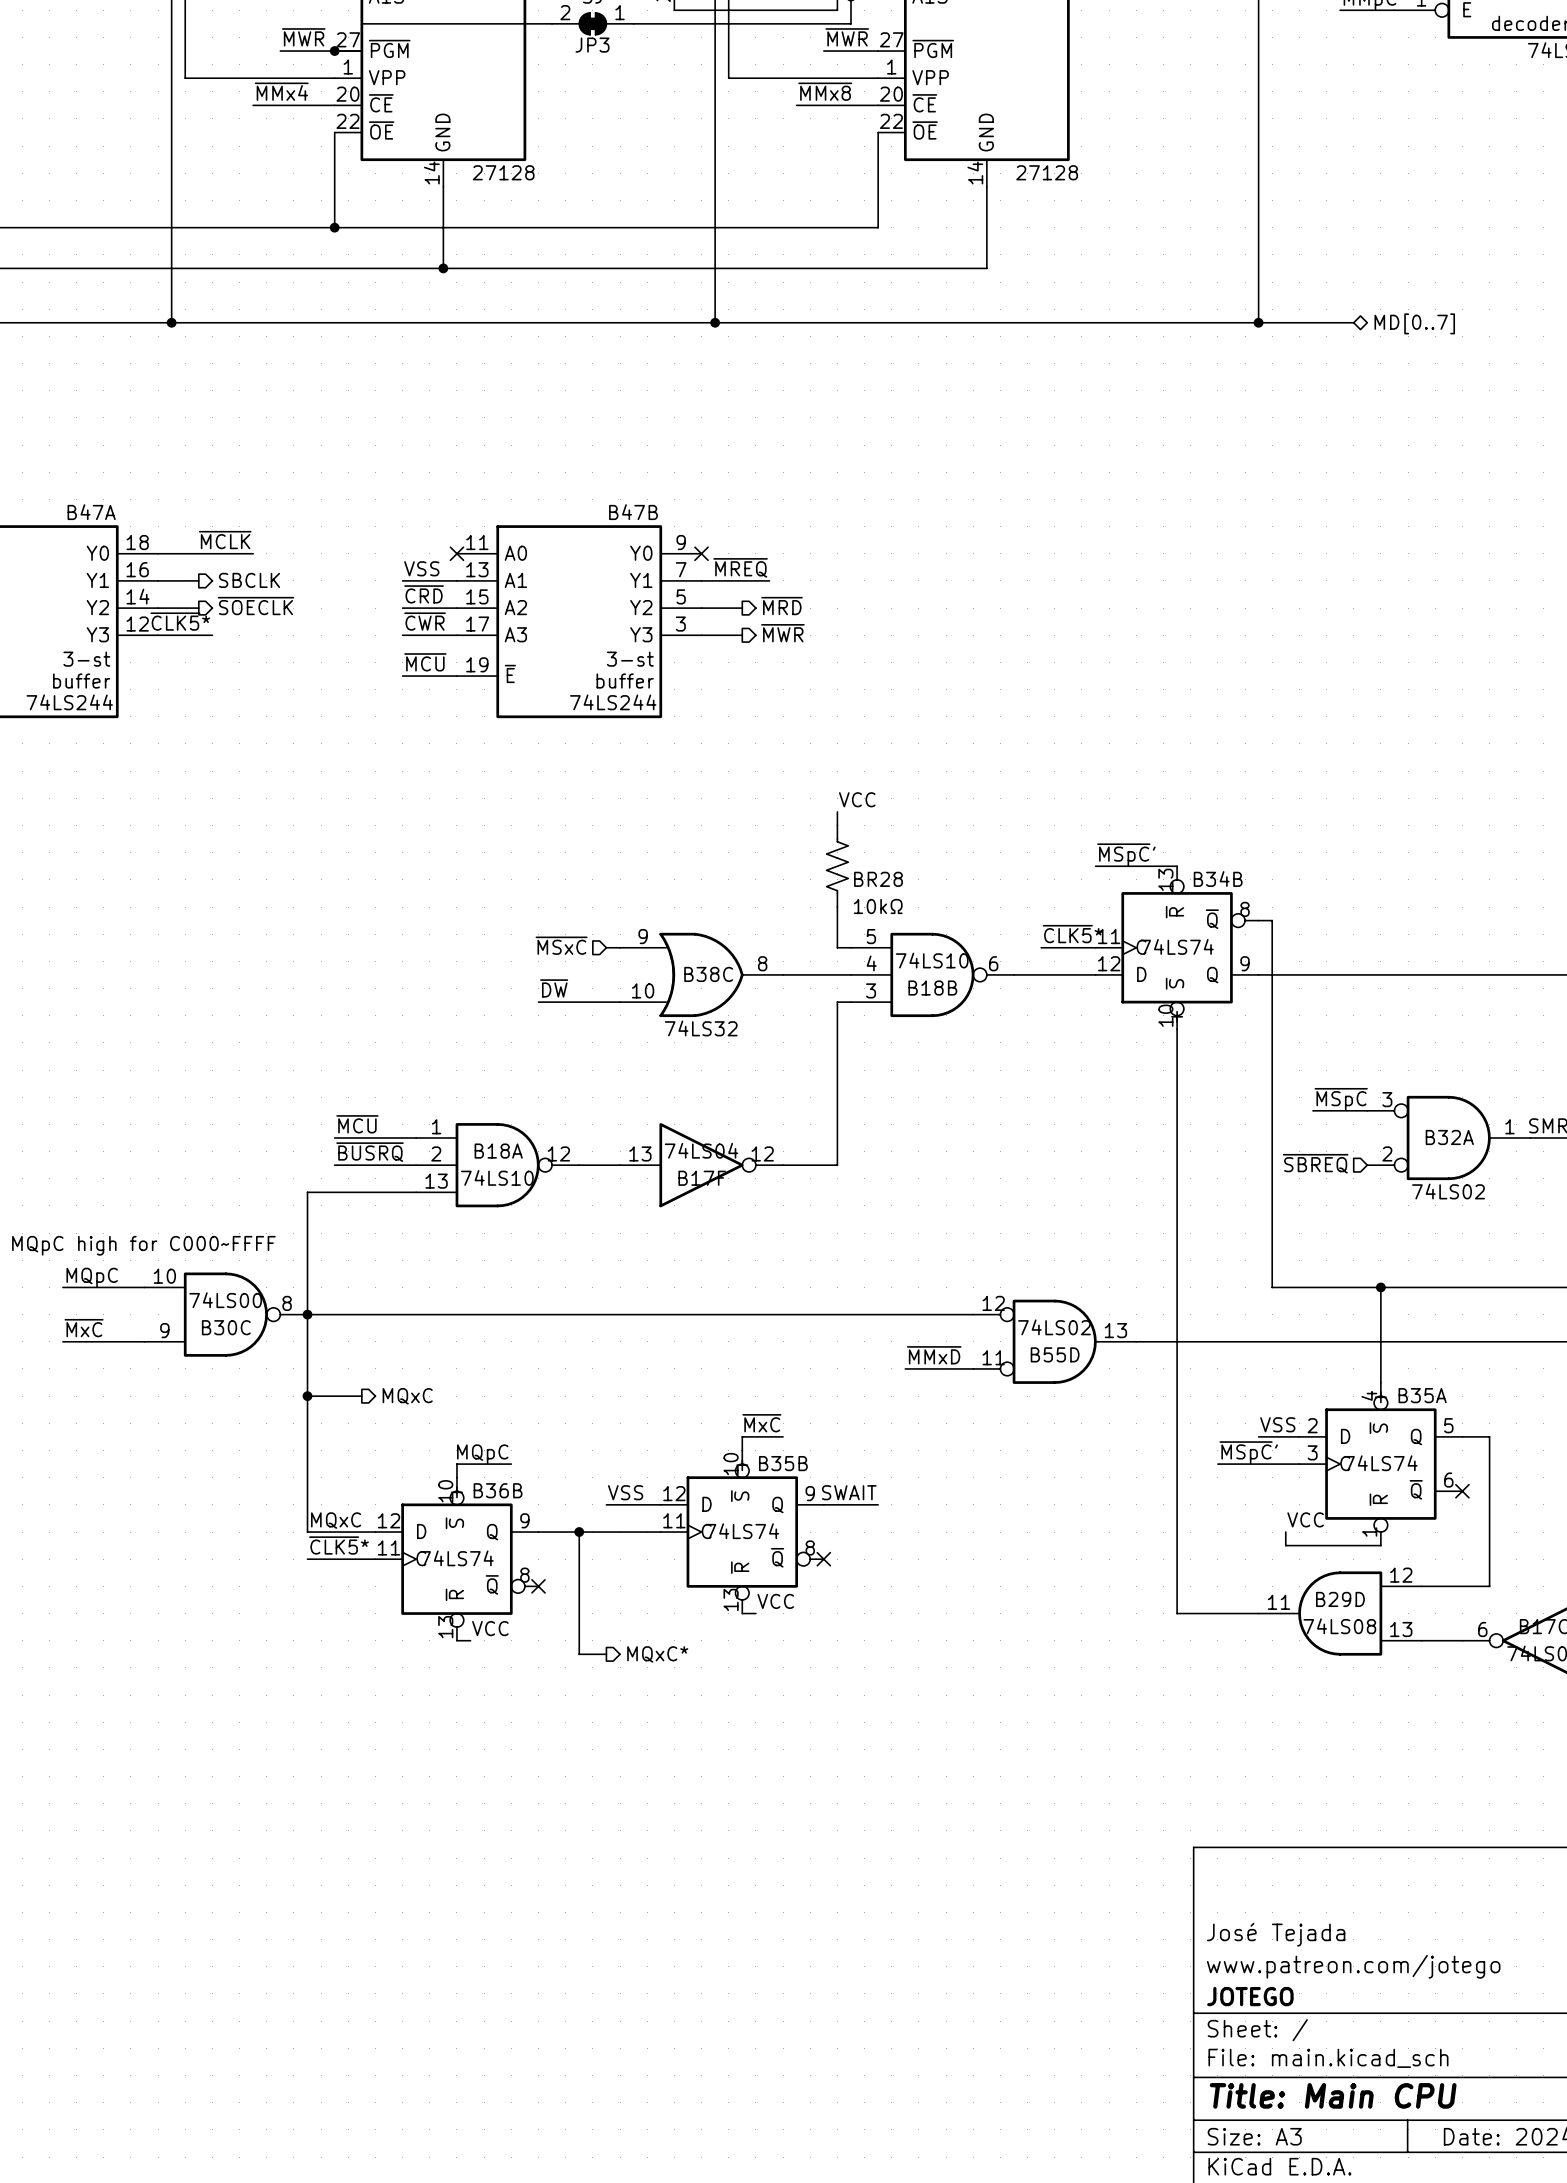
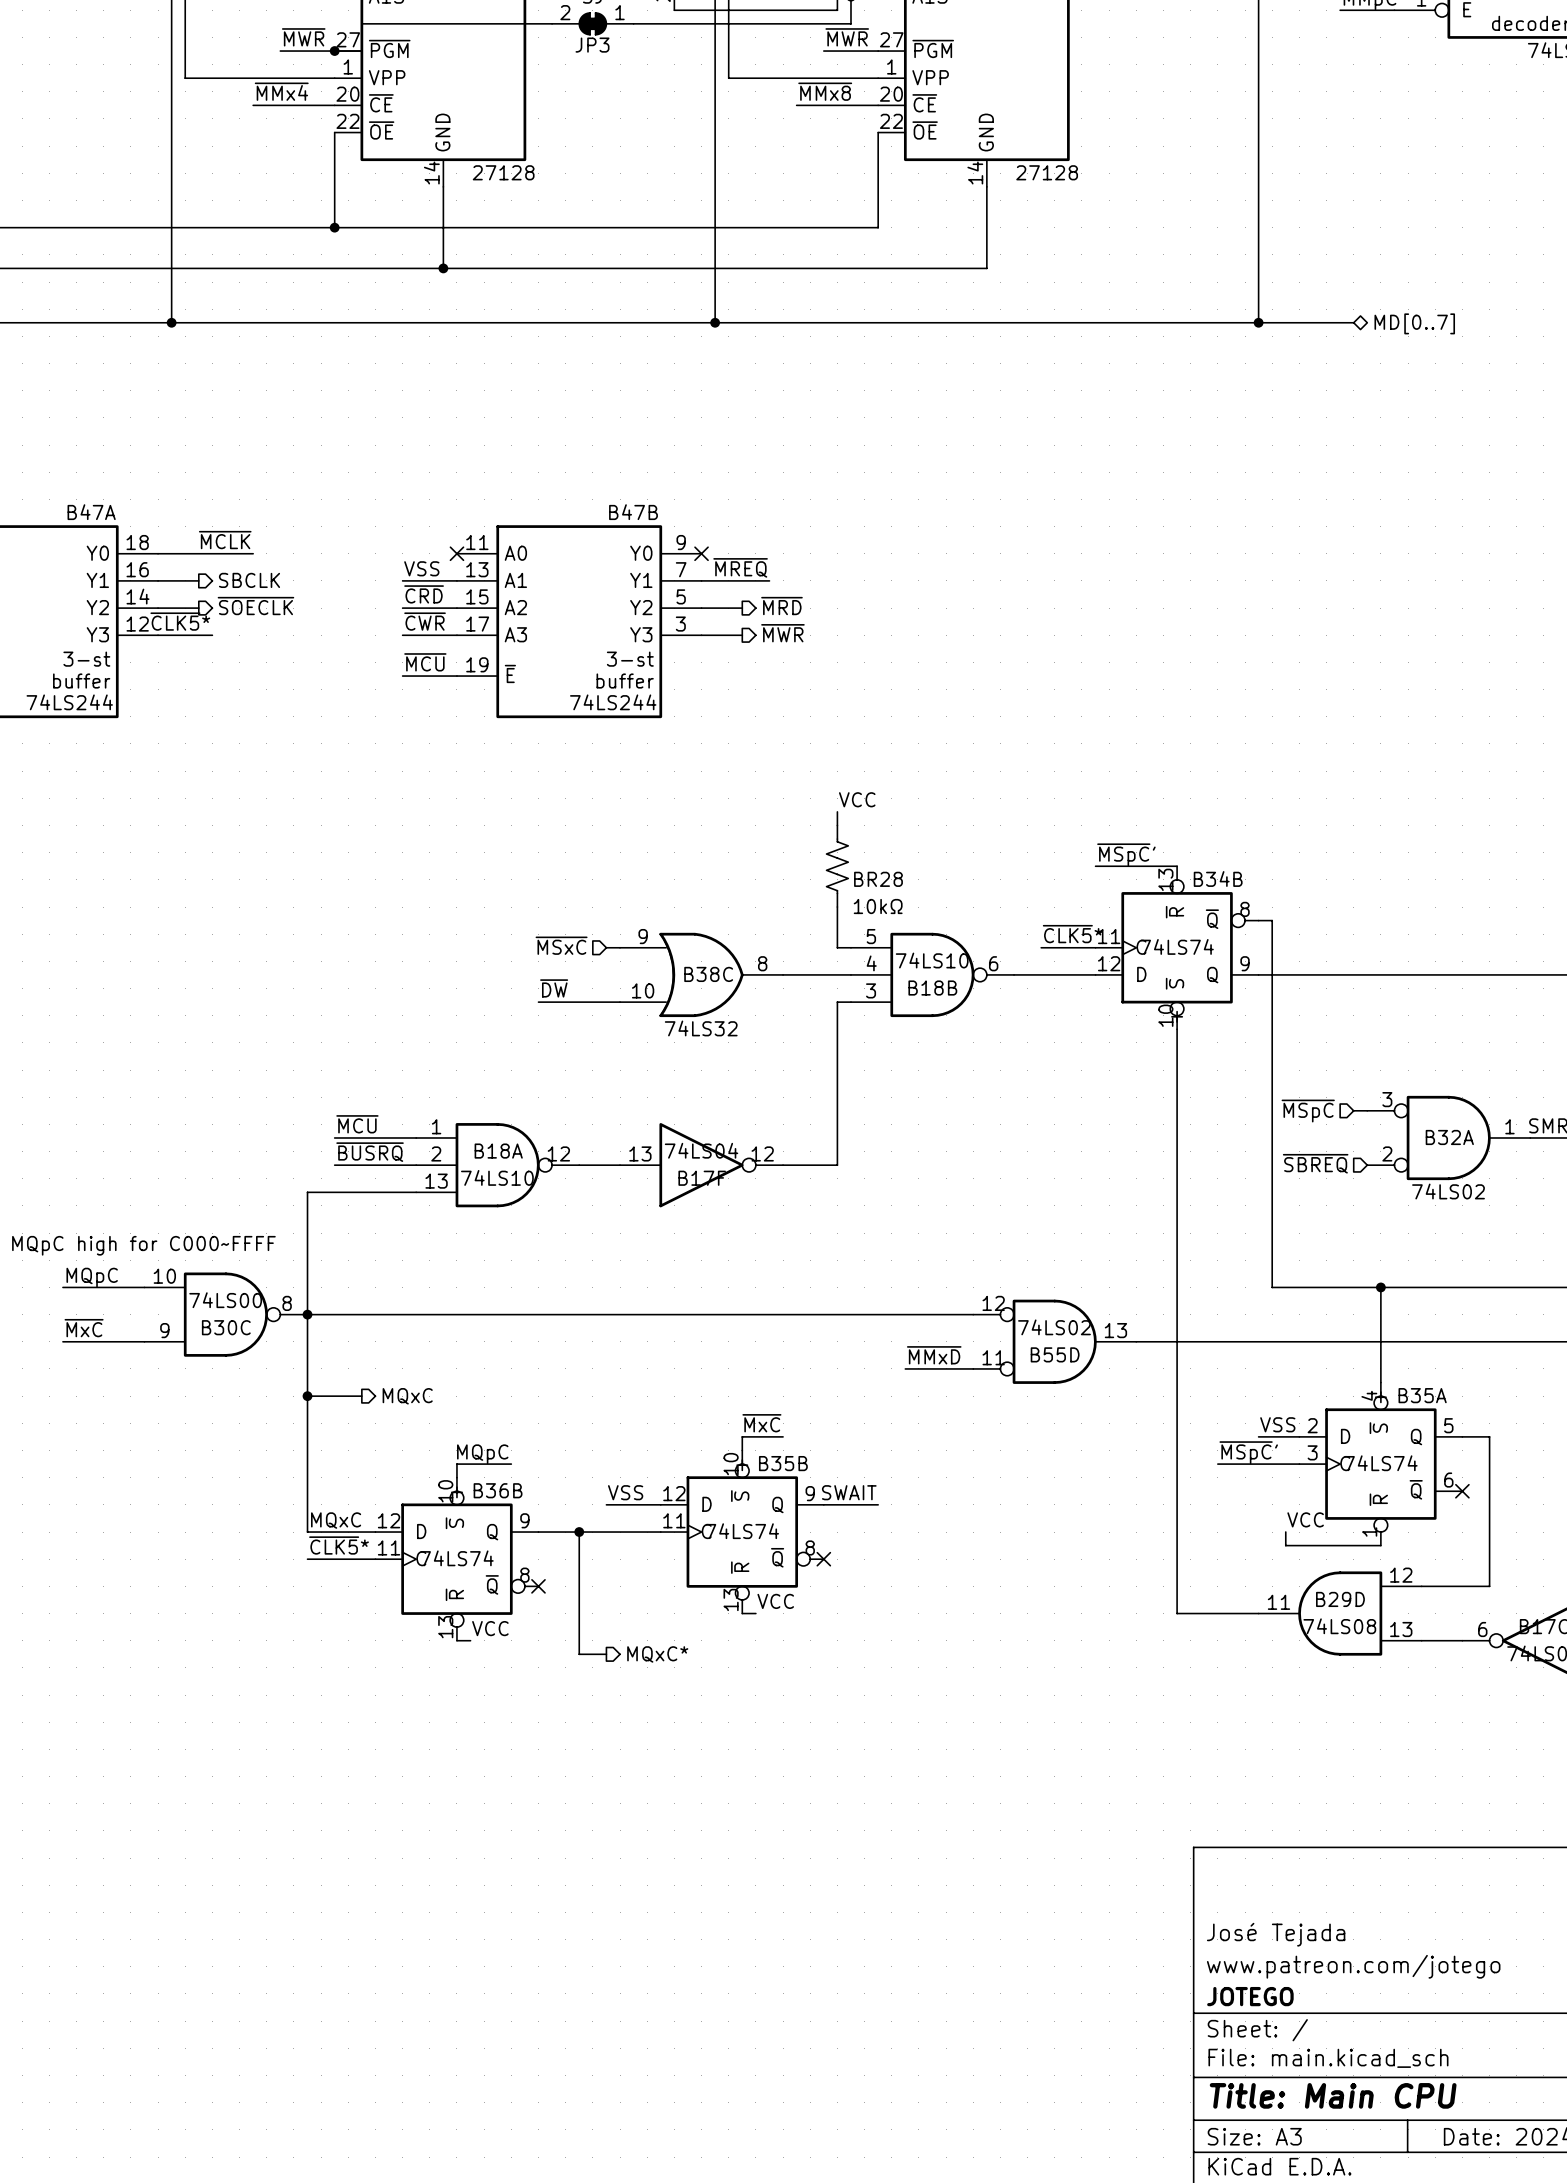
label: ~{MSpC} (1341, 1099) -> none
wire: (1312, 1110) (1353, 1110) -> none
hierarchical label: none -> ~{MSpC} (1308, 1111)

